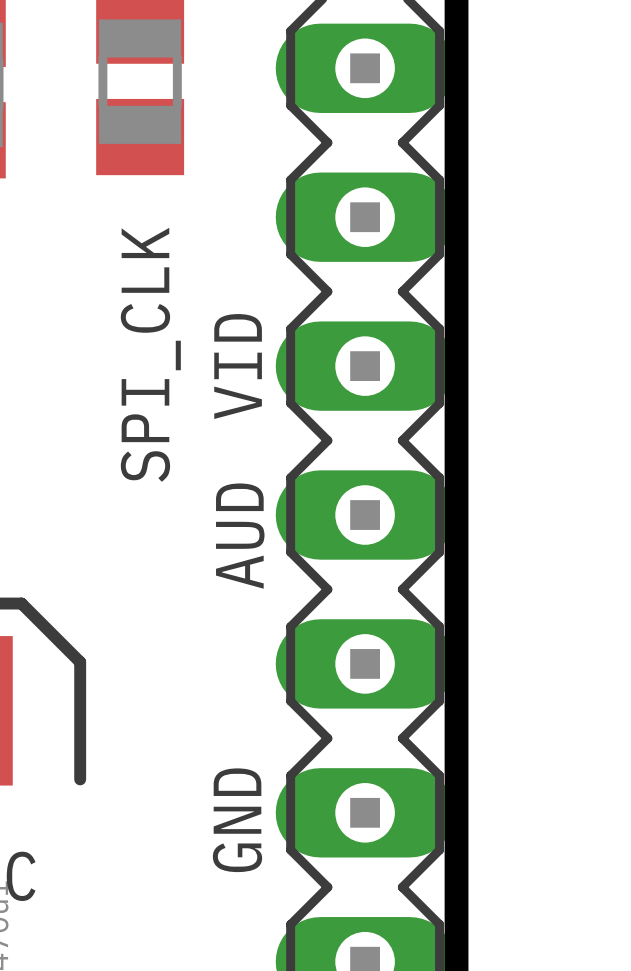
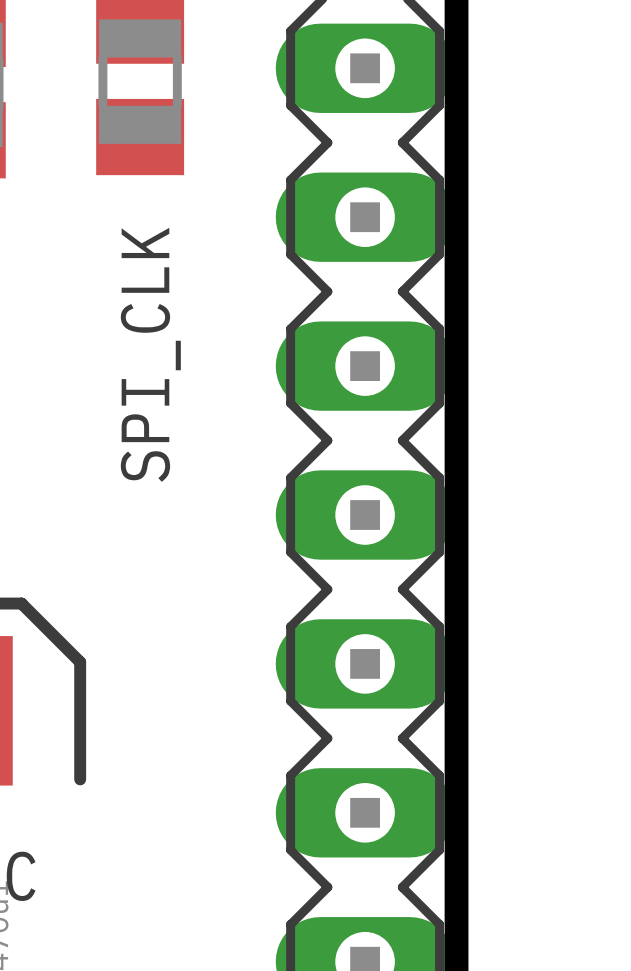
text: VID (238, 366) -> none
text: AUD (240, 536) -> none
text: GND (237, 820) -> none

